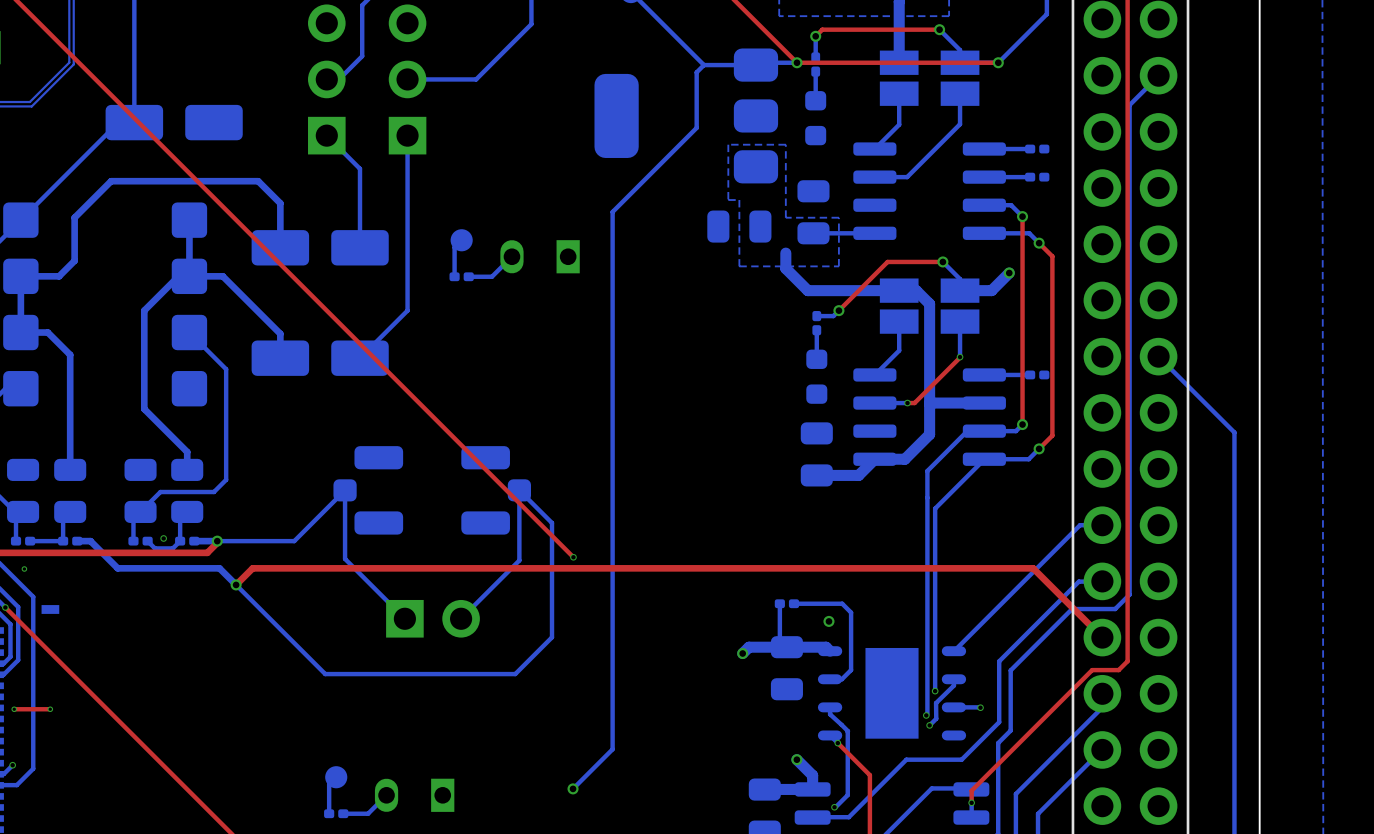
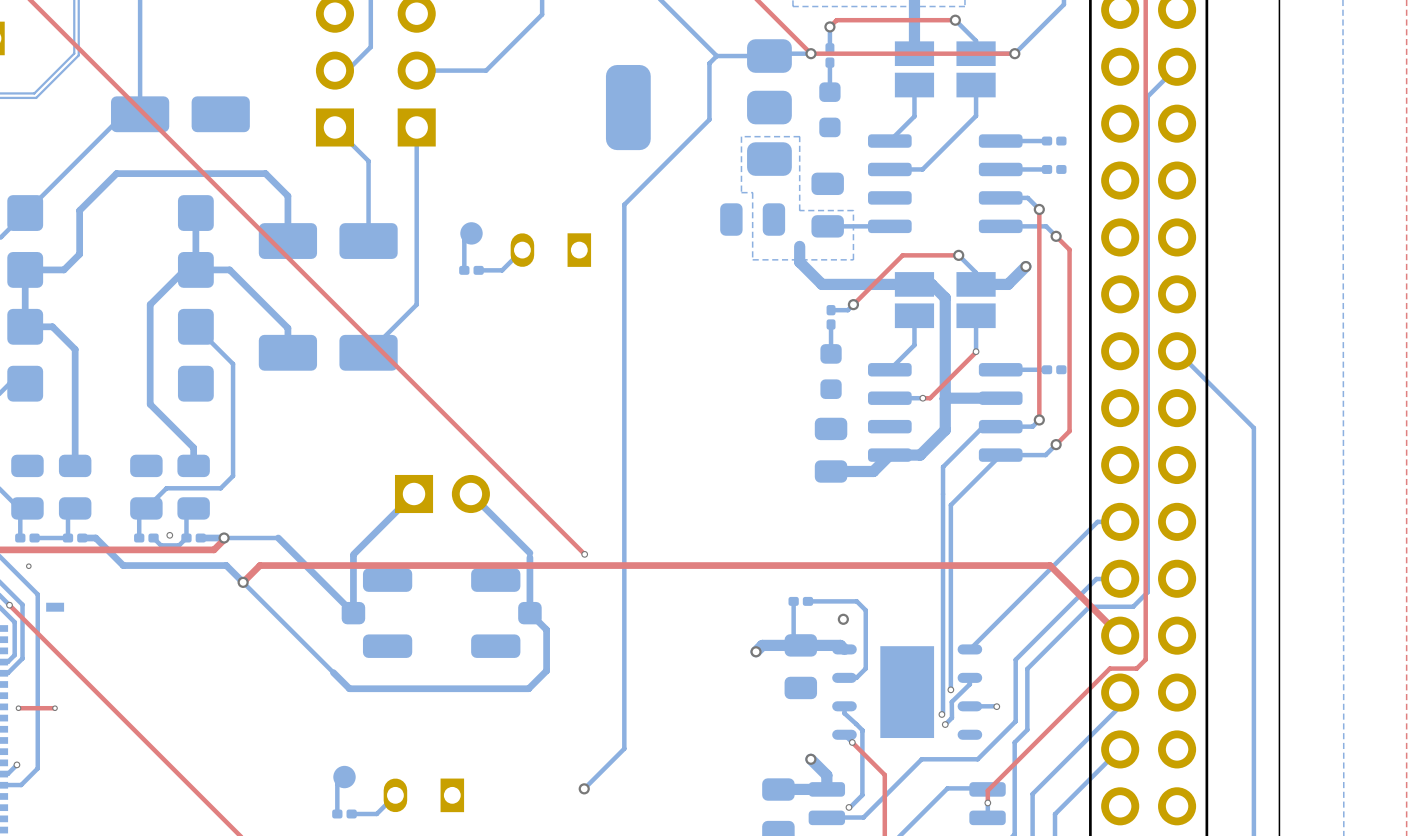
part: (368, 490) -> none
part: (496, 490) -> none
bottom track: none -> (414, 494) (353, 554)
bottom track: none -> (470, 494) (529, 553)
bottom track: (270, 541) (294, 541) (345, 490) (345, 557) -> (278, 538) (353, 613) (353, 556)
bottom track: (519, 555) (519, 490) (552, 522) (552, 637) (515, 674) (325, 674) -> (529, 557) (529, 613) (546, 629) (546, 670) (528, 688) (349, 688) (333, 672)
bottom track: (345, 558) (404, 618) -> none
bottom track: (519, 560) (461, 618) -> none
part: none -> (376, 613)
part: none -> (506, 613)
part position: (432, 618) -> (442, 494)

